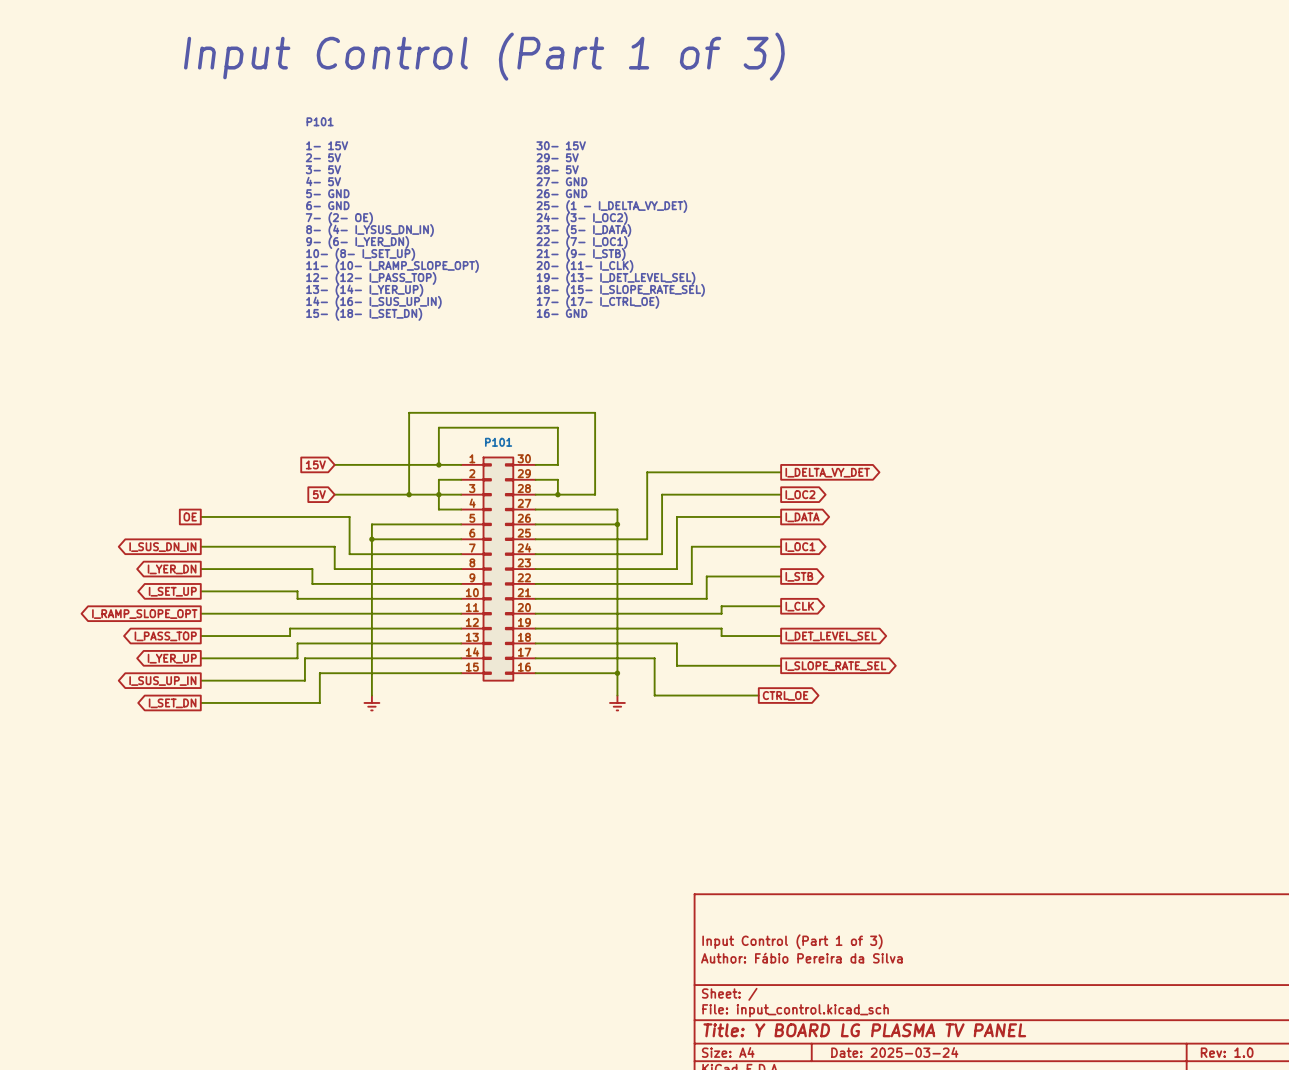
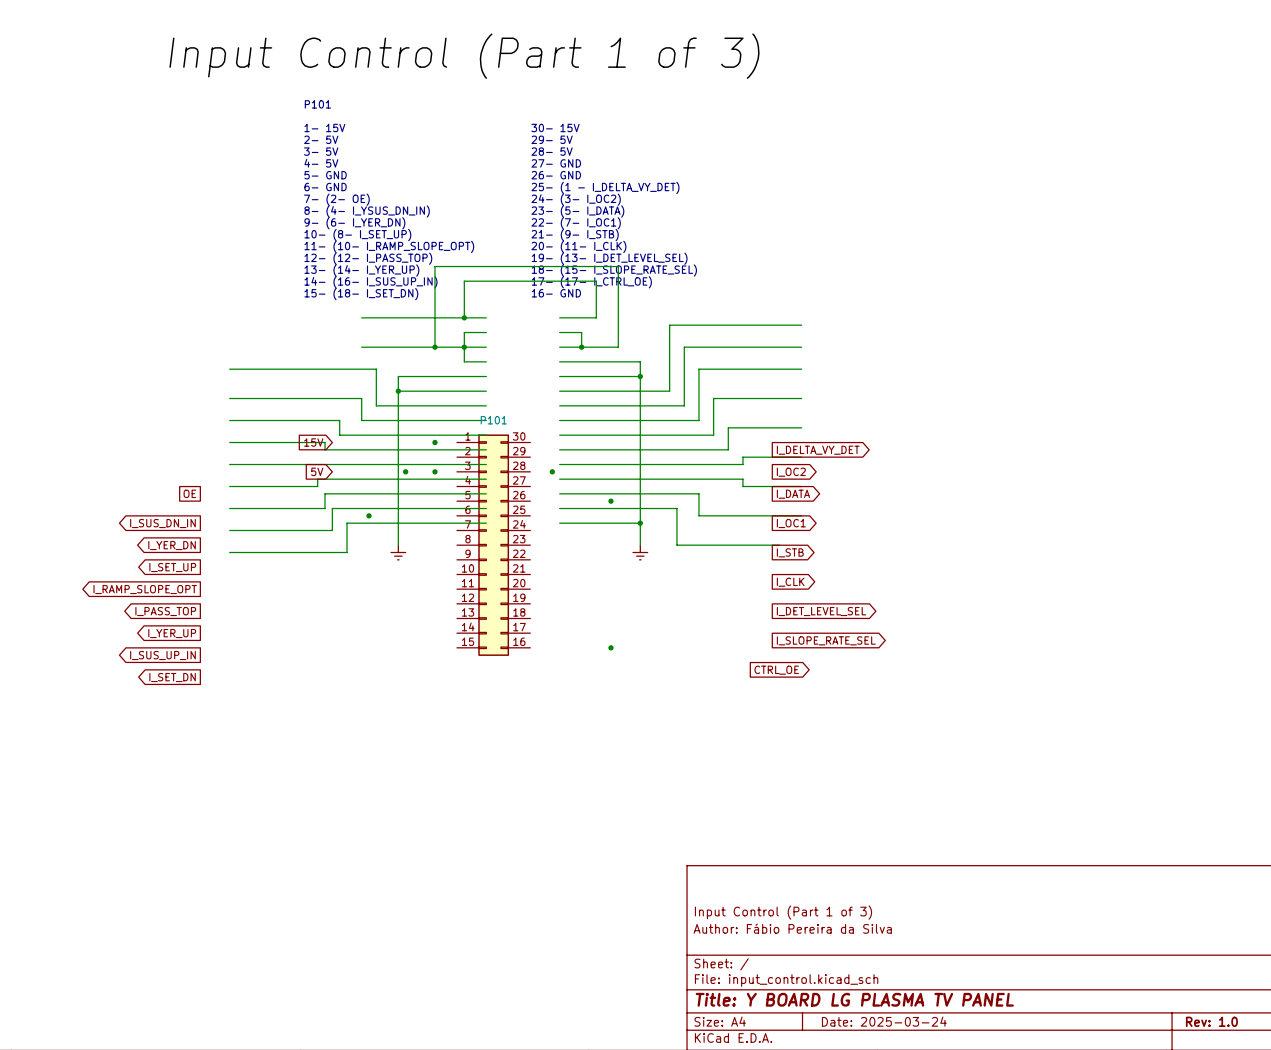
text: Input Control (Part 1 of 3) (484, 56) -> none
label: none -> Input Control (Part 1 of 3) (464, 56)
wire: none -> (464, 317) (464, 281) (596, 281) (596, 317) (559, 317)
junction: none -> (464, 317)
wire: none -> (435, 347) (435, 266) (618, 266) (618, 347) (559, 347)
junction: none -> (435, 347)
junction: none -> (464, 347)
junction: none -> (581, 347)
wire: none -> (559, 361) (640, 361) (640, 449) (559, 449)
wire: none -> (801, 369) (698, 369) (698, 420) (559, 420)
junction: none -> (640, 376)
junction: none -> (398, 391)
wire: (409, 412) (409, 494) -> (405, 391) (398, 391)
wire: (490, 412) (565, 412) -> none
wire: (595, 412) (595, 494) (535, 494) -> (588, 391) (669, 391) (669, 325) (801, 325)
wire: none -> (229, 398) (361, 398) (361, 420) (486, 420)
wire: (438, 427) (438, 464) -> (435, 405) (376, 405) (376, 369) (229, 369)
wire: (490, 427) (557, 427) (557, 464) (535, 464) -> none
wire: (334, 464) (461, 464) -> (361, 317) (486, 317)
wire: (736, 472) (781, 472) -> (728, 449) (728, 427) (801, 427)
wire: (461, 479) (438, 479) (438, 509) (461, 509) -> (486, 332) (464, 332) (464, 361) (486, 361)
wire: (535, 479) (557, 479) (557, 494) -> (559, 332) (581, 332) (581, 347)
wire: (334, 494) (461, 494) -> (361, 347) (486, 347)
wire: (781, 494) (662, 494) (662, 554) (535, 554) -> (801, 347) (684, 347) (684, 405) (559, 405)
wire: (535, 509) (617, 509) (617, 695) -> none
wire: (200, 516) (327, 516) -> (229, 508) (325, 508) (325, 493)
wire: (349, 516) (349, 546) -> (347, 493) (486, 493)
wire: (676, 516) (676, 569) (535, 569) -> (669, 493) (559, 493)
wire: (706, 516) (781, 516) -> (698, 493) (698, 515) (801, 515)
wire: (461, 524) (371, 524) (371, 695) -> (486, 376) (398, 376) (398, 545)
wire: (535, 524) (617, 524) -> (559, 376) (640, 376)
wire: (371, 539) (461, 539) -> none
wire: (535, 539) (647, 539) -> (640, 545) (640, 515)
wire: (200, 546) (334, 546) -> (486, 508) (332, 508) (332, 523)
wire: none -> (347, 523) (486, 523)
junction: none -> (640, 523)
wire: (781, 546) (691, 546) (691, 583) (535, 583) -> (801, 398) (713, 398) (713, 435) (559, 435)
wire: (334, 554) (334, 569) (461, 569) -> (332, 530) (229, 530)
wire: (349, 554) (461, 554) -> (347, 530) (347, 552) (229, 552)
wire: (200, 569) (312, 569) (312, 583) (461, 583) -> (229, 420) (339, 420) (339, 435) (486, 435)
power symbol: none -> (398, 552)
power symbol: none -> (640, 552)
wire: (781, 576) (706, 576) (706, 598) (535, 598) -> none
wire: (200, 591) (297, 591) (297, 598) (461, 598) -> (229, 442) (325, 442) (325, 449) (486, 449)
wire: (781, 606) (721, 606) (721, 613) (535, 613) -> (801, 457) (742, 457) (742, 464) (559, 464)
wire: (200, 613) (461, 613) -> (229, 464) (486, 464)
wire: (461, 628) (290, 628) (290, 636) (200, 636) -> (486, 479) (317, 479) (317, 486) (229, 486)
wire: (535, 628) (721, 628) (721, 636) (781, 636) -> (559, 479) (742, 479) (742, 486) (801, 486)
wire: (461, 643) (297, 643) (297, 658) (200, 658) -> none
wire: (535, 643) (676, 643) (676, 665) (781, 665) -> none
wire: (461, 658) (304, 658) (304, 680) (200, 680) -> none
wire: (535, 658) (654, 658) (654, 695) (758, 695) -> (559, 508) (676, 508) (676, 545) (779, 545)
wire: (461, 673) (319, 673) (319, 702) (200, 702) -> none
wire: (535, 673) (617, 673) -> (559, 523) (640, 523)
power symbol: (371, 702) -> none
power symbol: (617, 702) -> none

